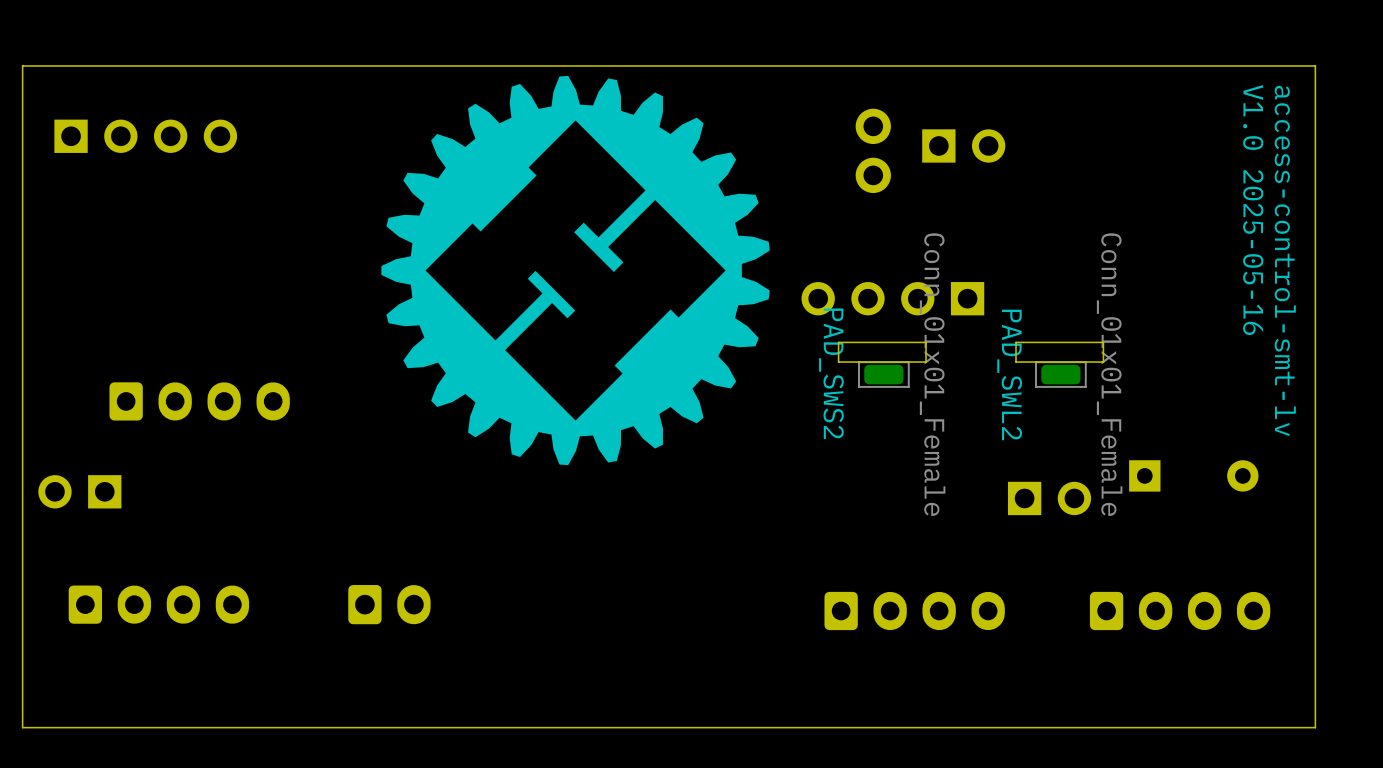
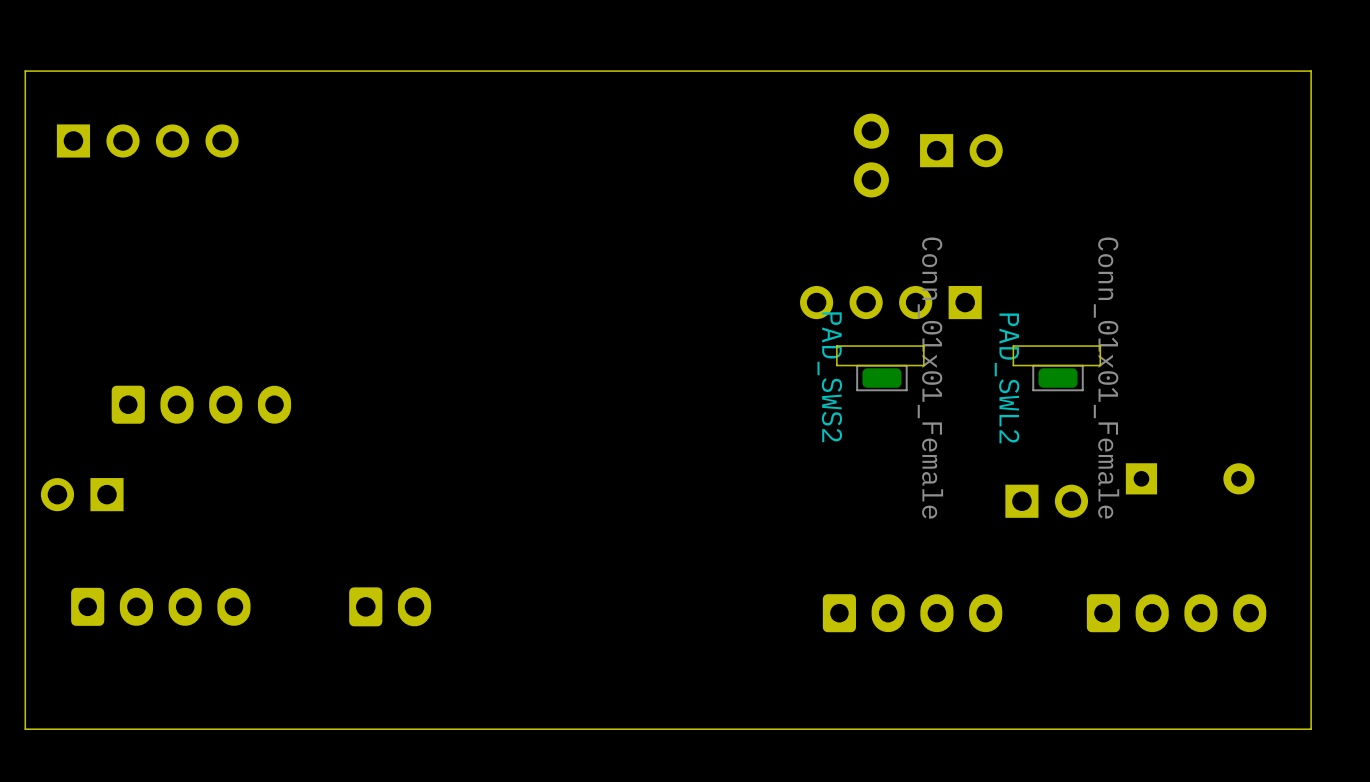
drawing: [381, 75, 770, 466] -> none
text: V1.0 2025-05-16 (1253, 210) -> none
text: access-control-smt-lv (1285, 261) -> none

